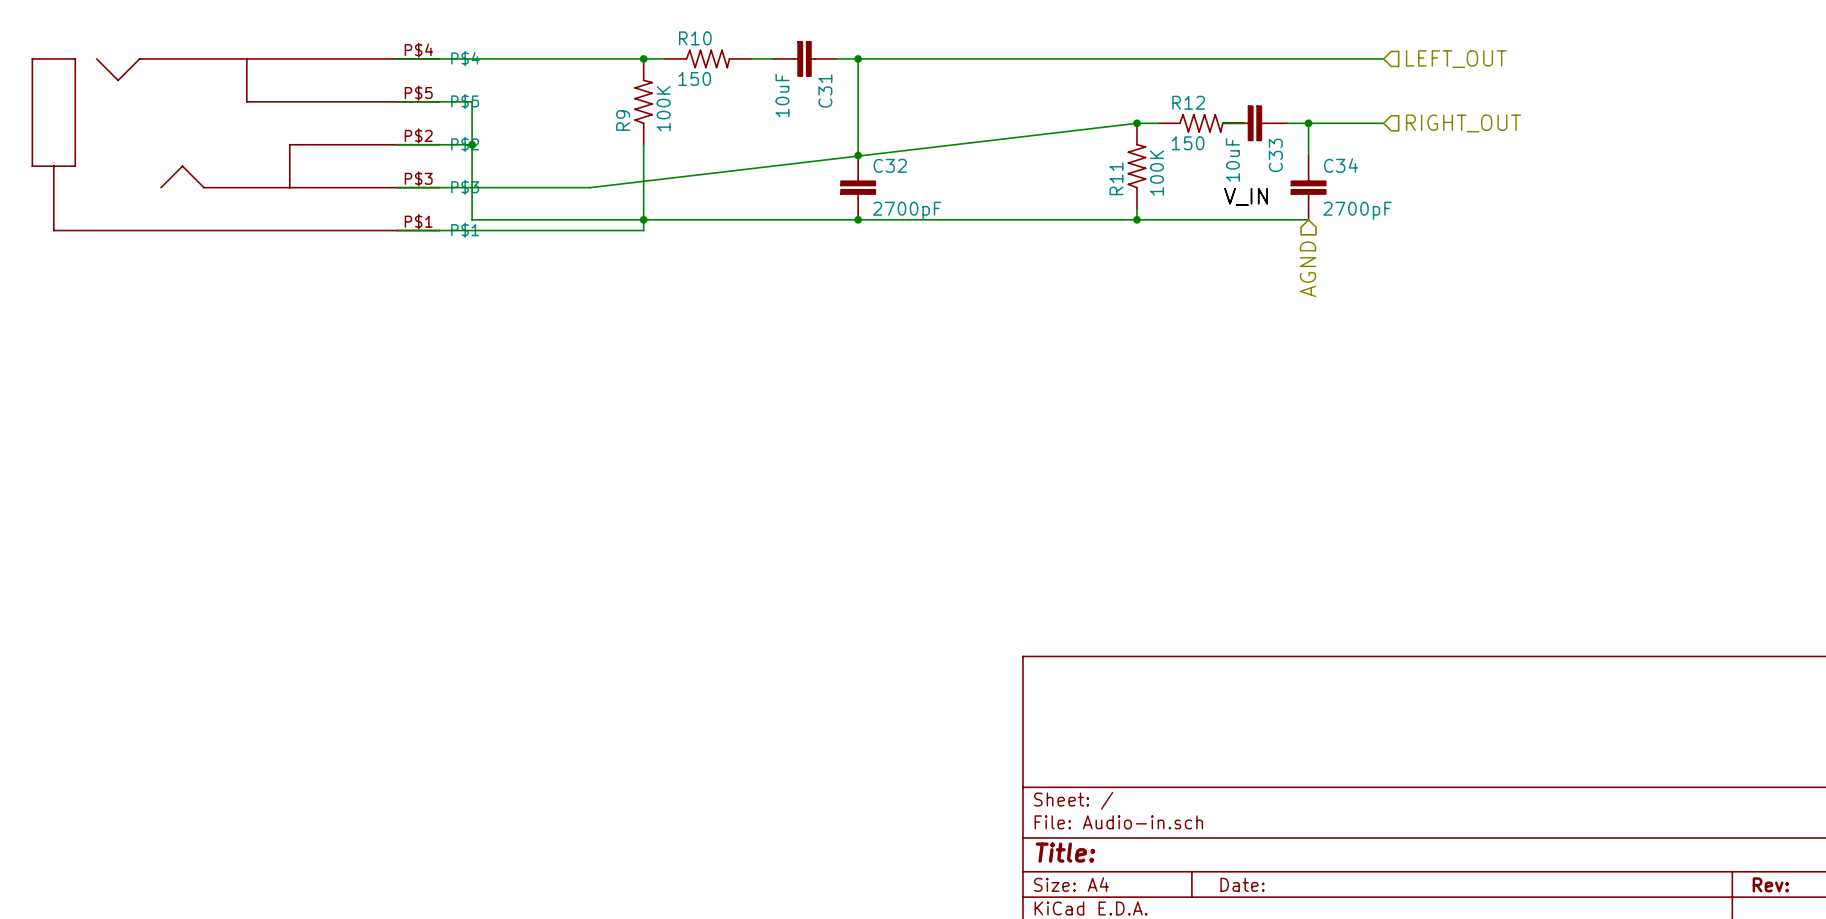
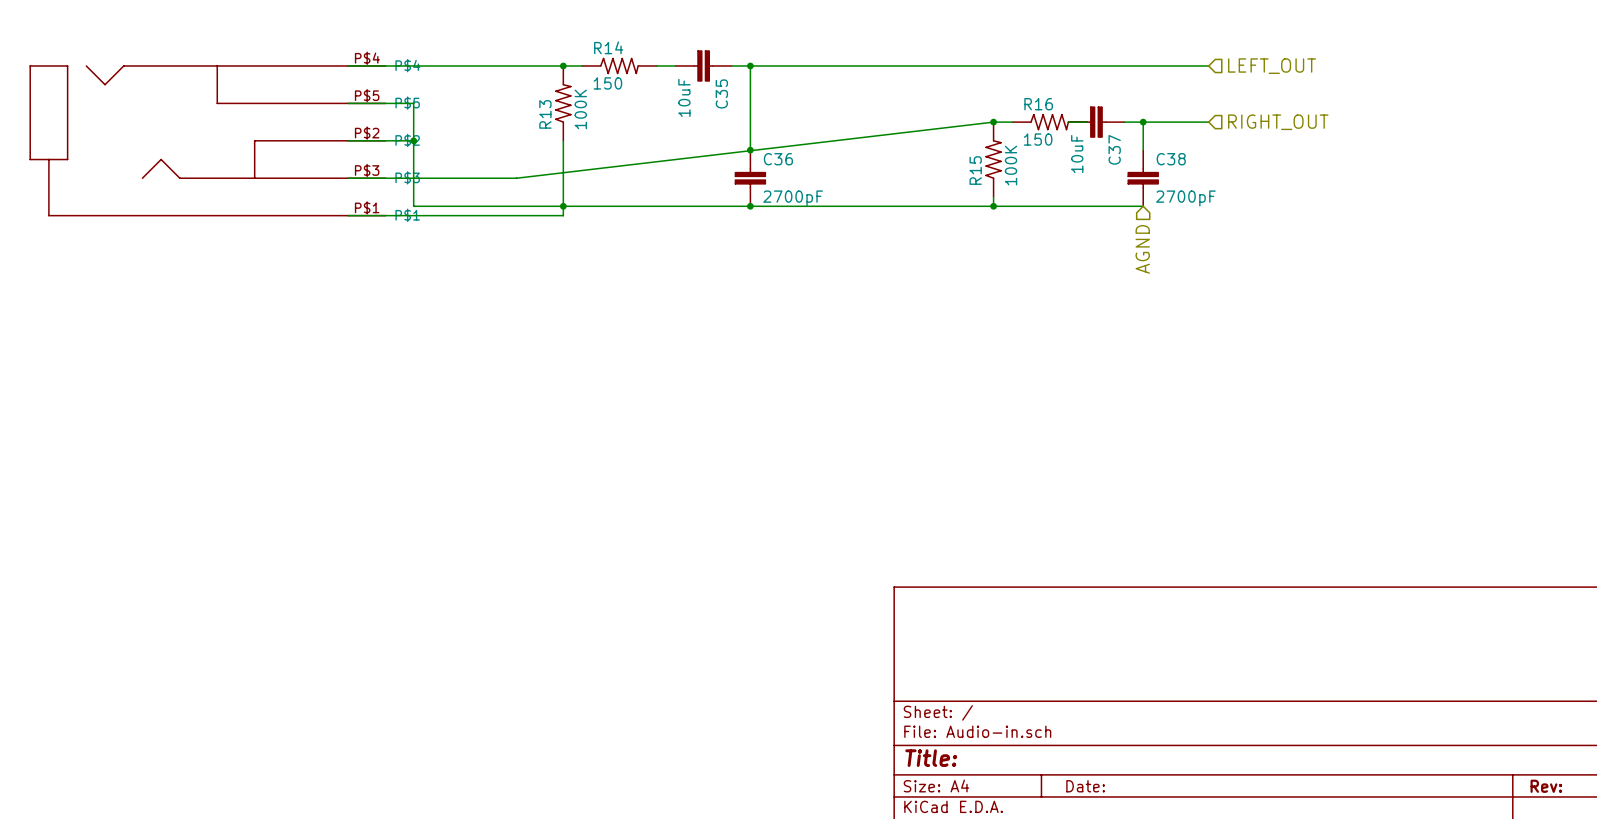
R10 name: R10 (695, 38) -> R14 (608, 47)
C31 name: C31 (825, 91) -> C35 (721, 93)
R12 name: R12 (1188, 102) -> R16 (1038, 104)
R9 name: R9 (623, 120) -> R13 (545, 114)
C33 name: C33 (1275, 155) -> C37 (1114, 149)
C32 name: C32 (890, 165) -> C36 (778, 159)
C34 name: C34 (1340, 165) -> C38 (1171, 159)
R11 name: R11 (1116, 178) -> R15 (975, 170)
label: V_IN (1246, 196) -> none

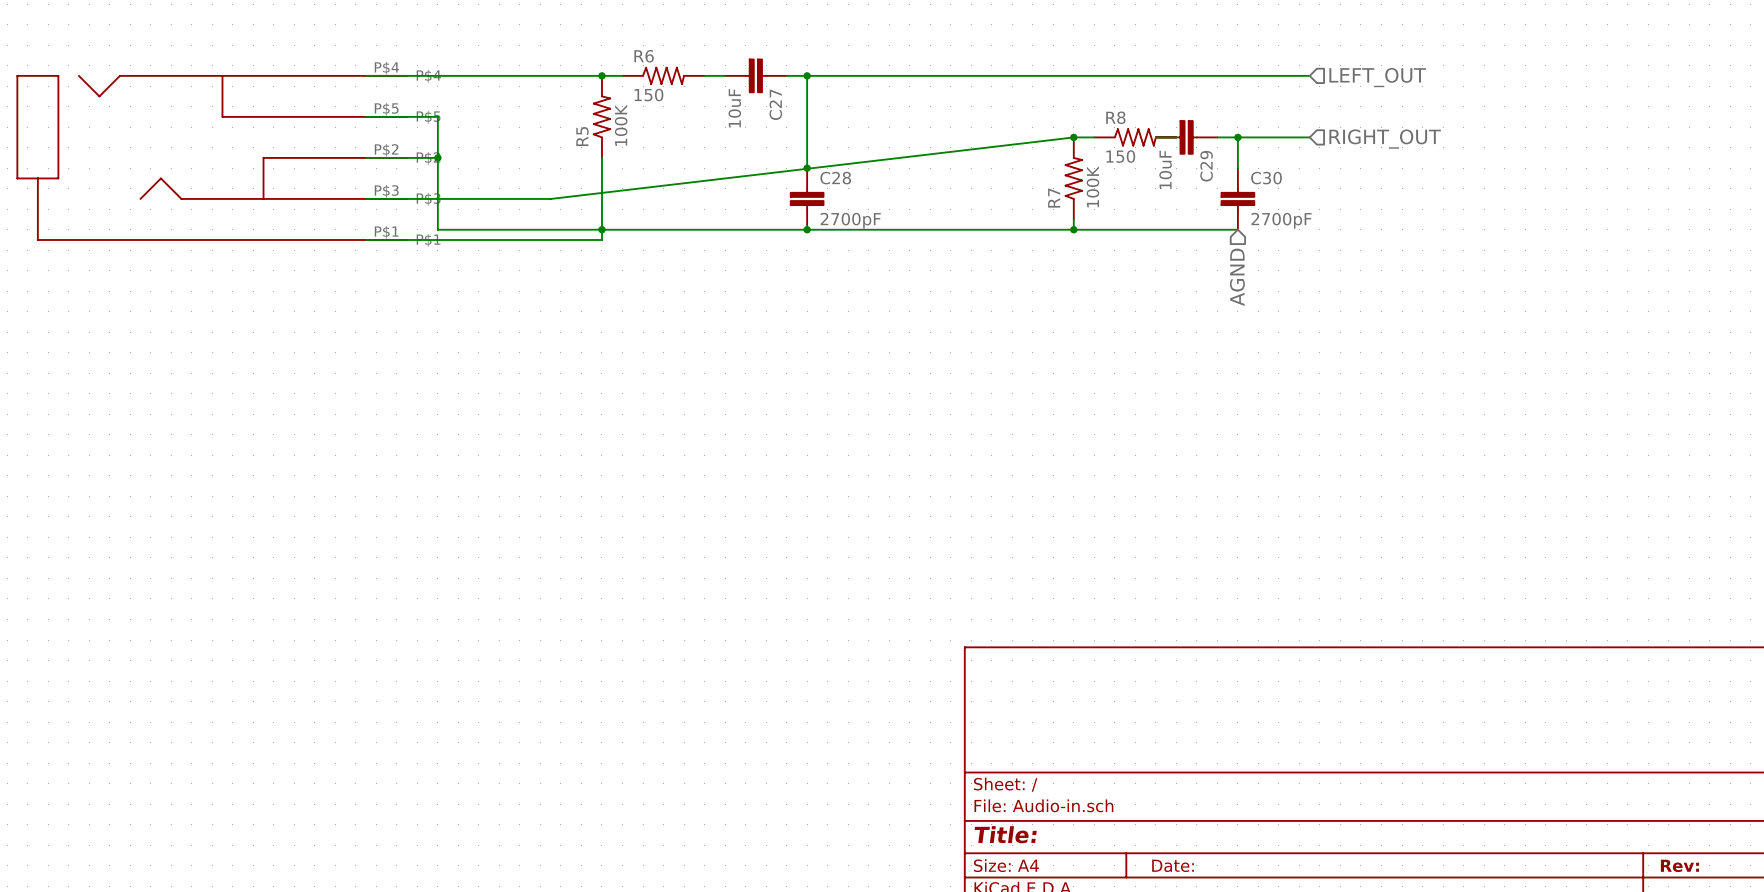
R14 name: R14 (608, 47) -> R6 (644, 56)
C35 name: C35 (721, 93) -> C27 (775, 104)
R16 name: R16 (1038, 104) -> R8 (1115, 117)
R13 name: R13 (545, 114) -> R5 (582, 136)
C37 name: C37 (1114, 149) -> C29 (1206, 166)
C36 name: C36 (778, 159) -> C28 (835, 178)
C38 name: C38 (1171, 159) -> C30 (1266, 178)
R15 name: R15 (975, 170) -> R7 (1054, 198)

